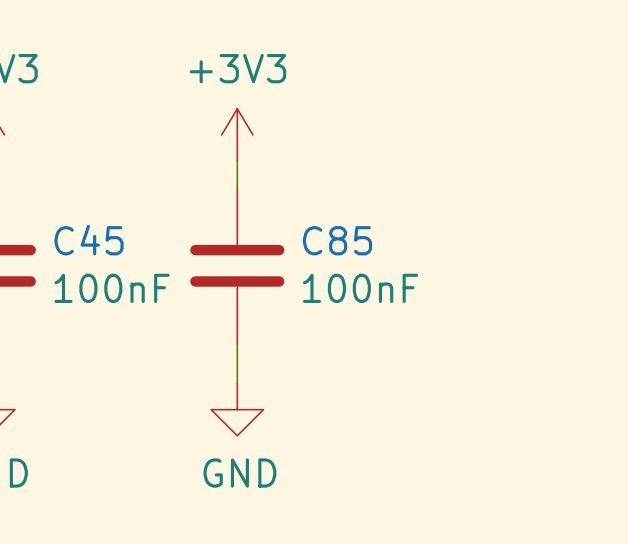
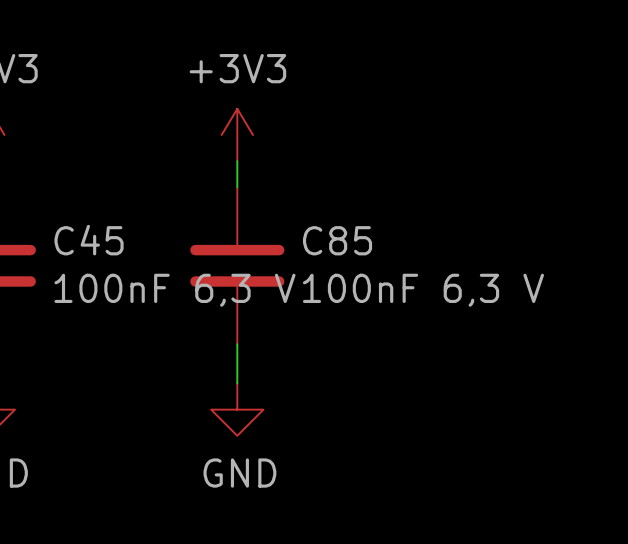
C45 value: 100nF (112, 288) -> 100nF 6,3 V (174, 290)
C85 value: 100nF (360, 288) -> 100nF 6,3 V (423, 290)

